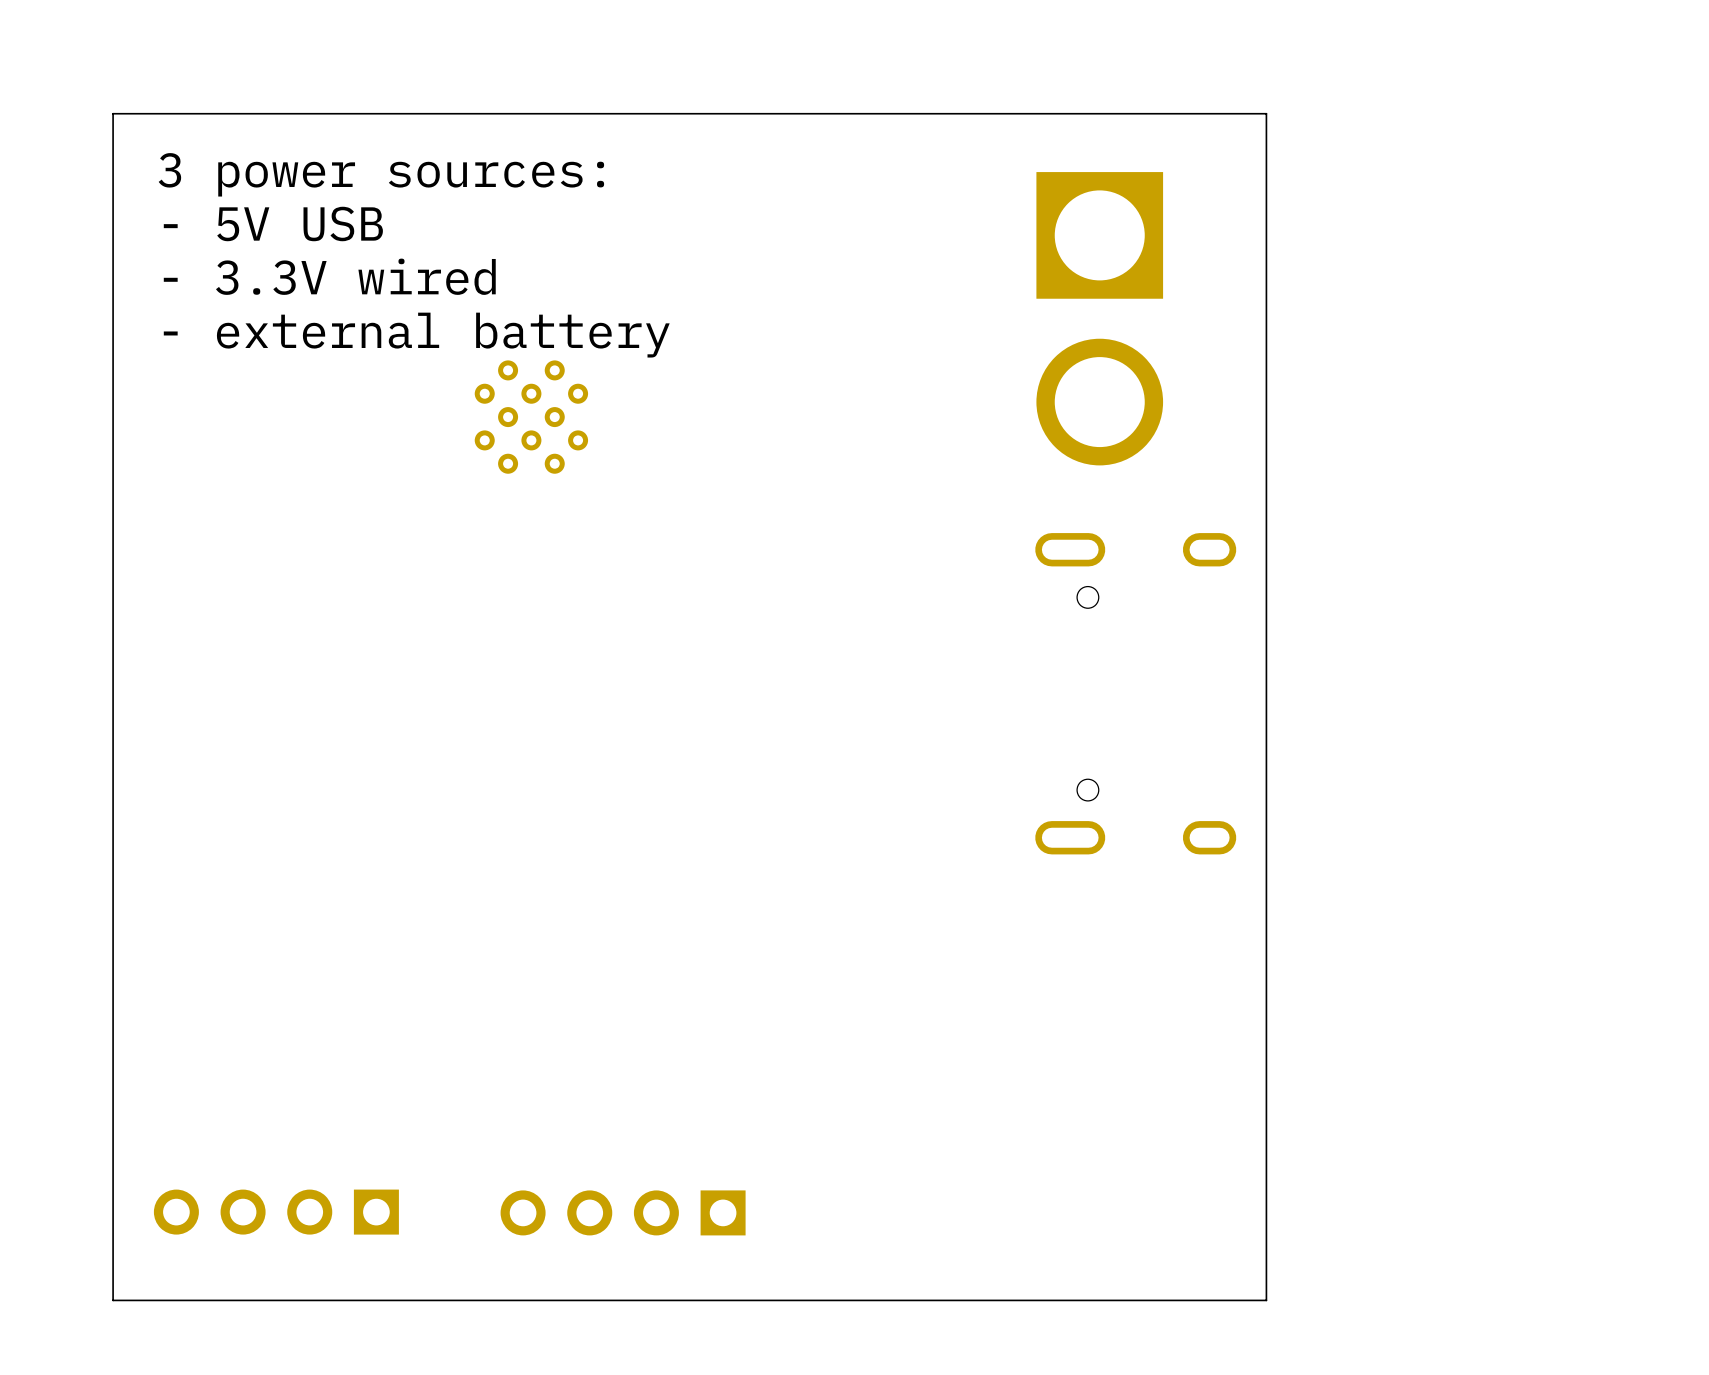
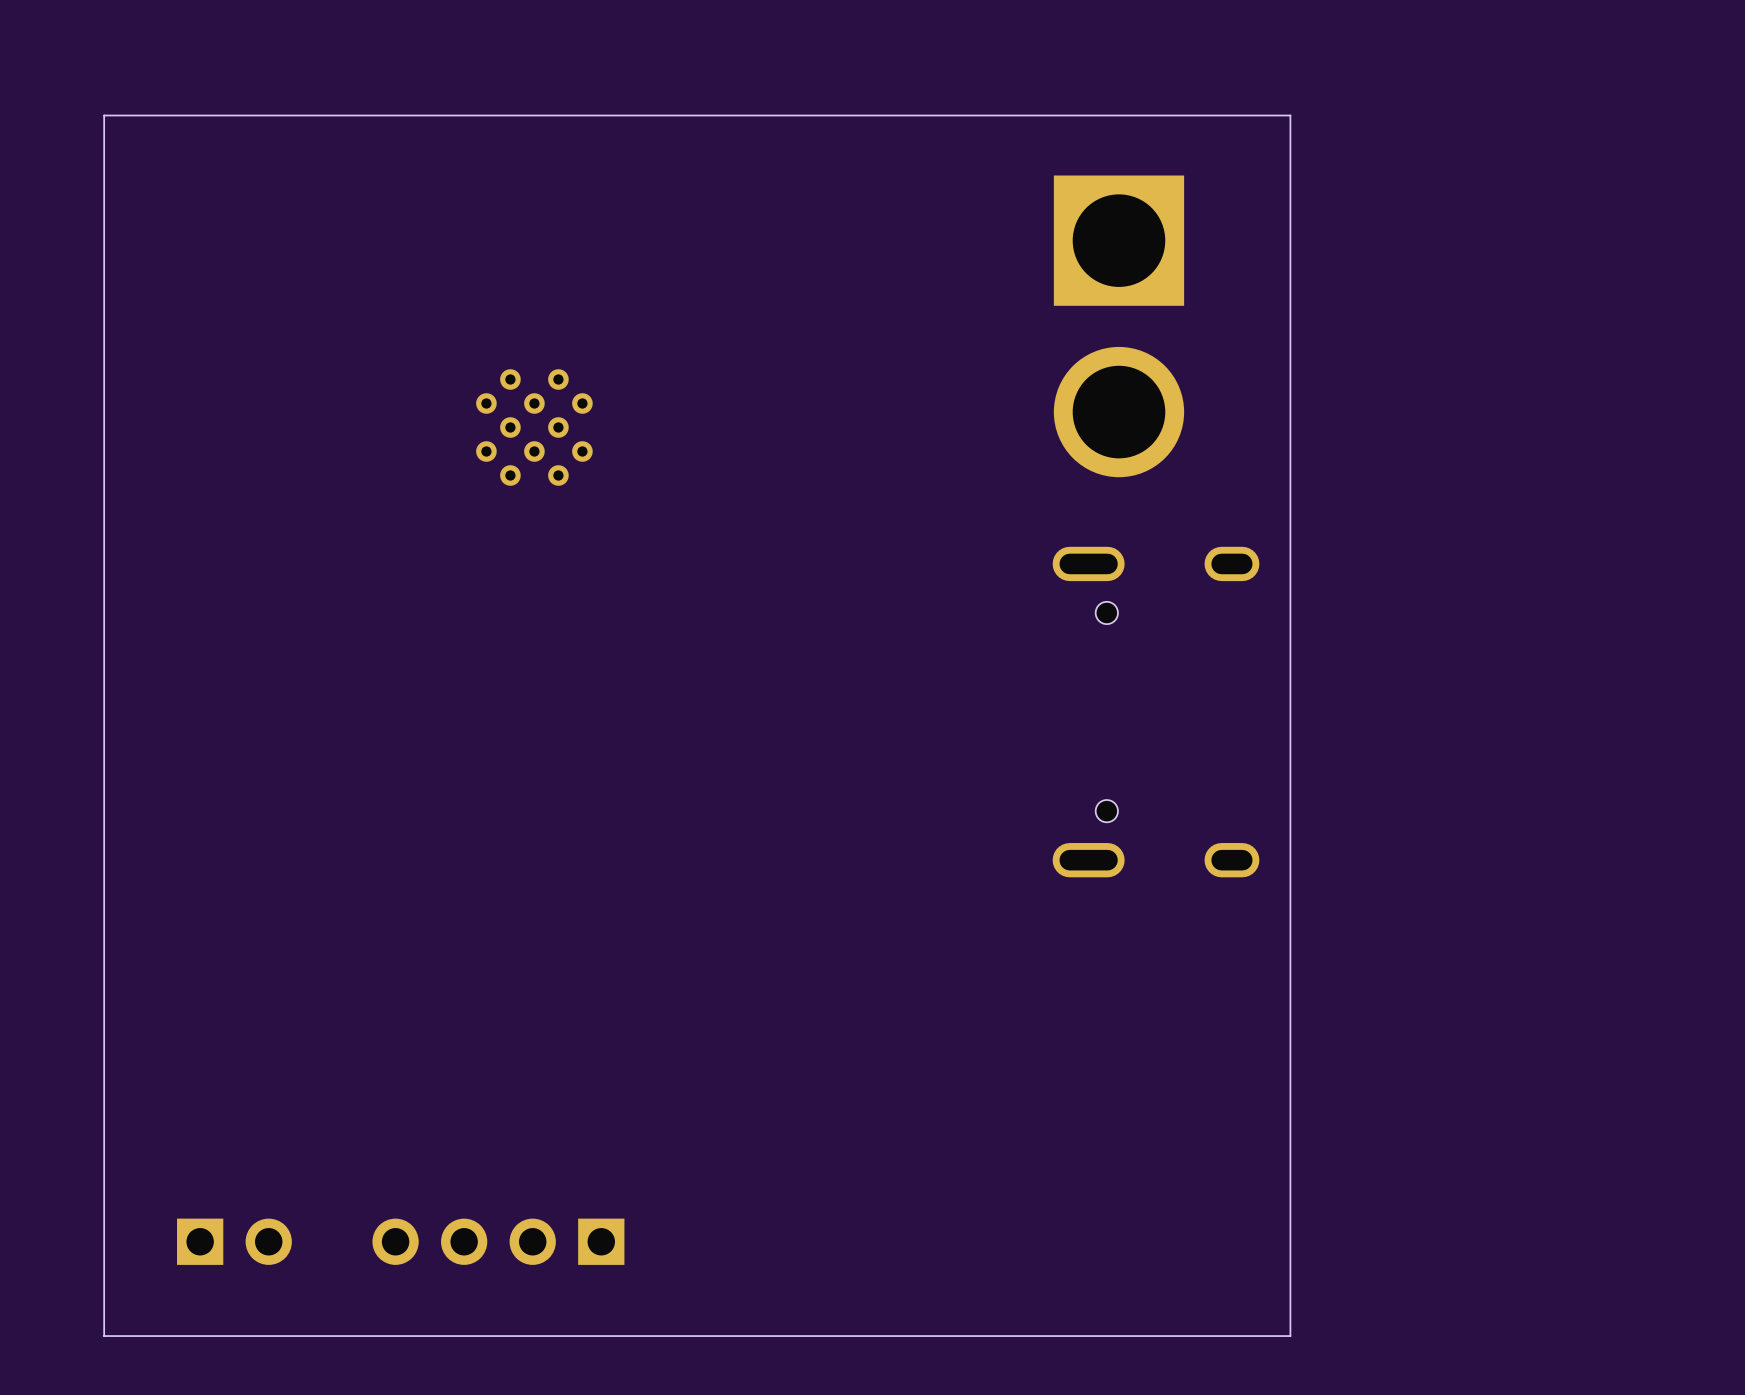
text: 3 power sources: (381, 174) -> none
text: - 5V USB (273, 223) -> none
text: - 3.3V wired (329, 276) -> none
text: - external battery (416, 335) -> none
part: none -> (234, 1241)
part: none -> (498, 1241)
part: (276, 1212) -> none
part: (623, 1212) -> none

